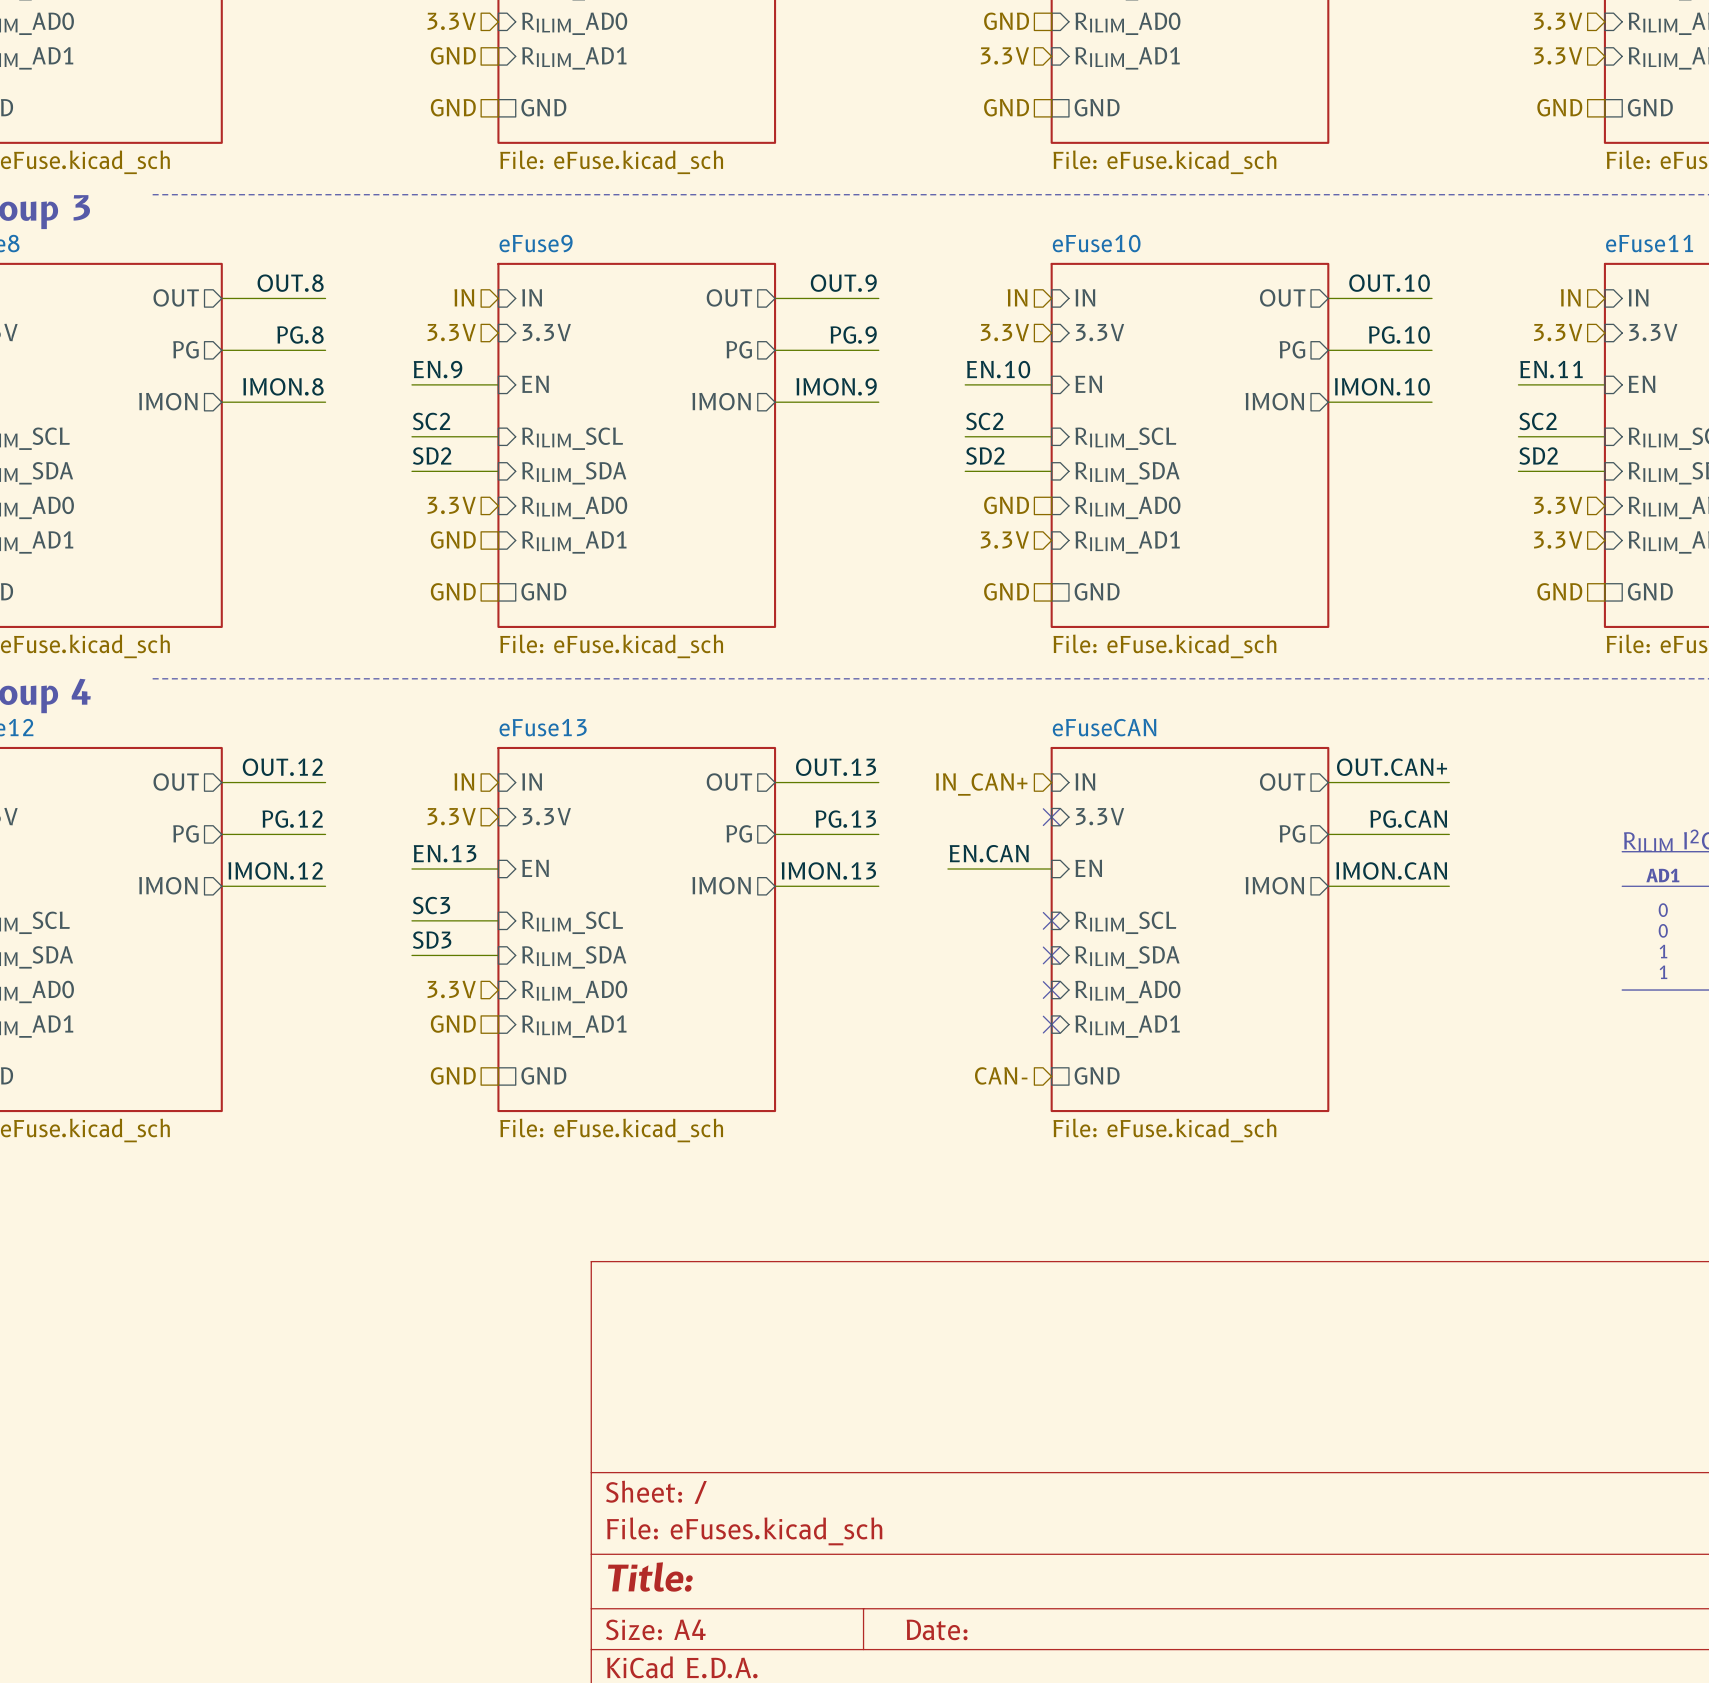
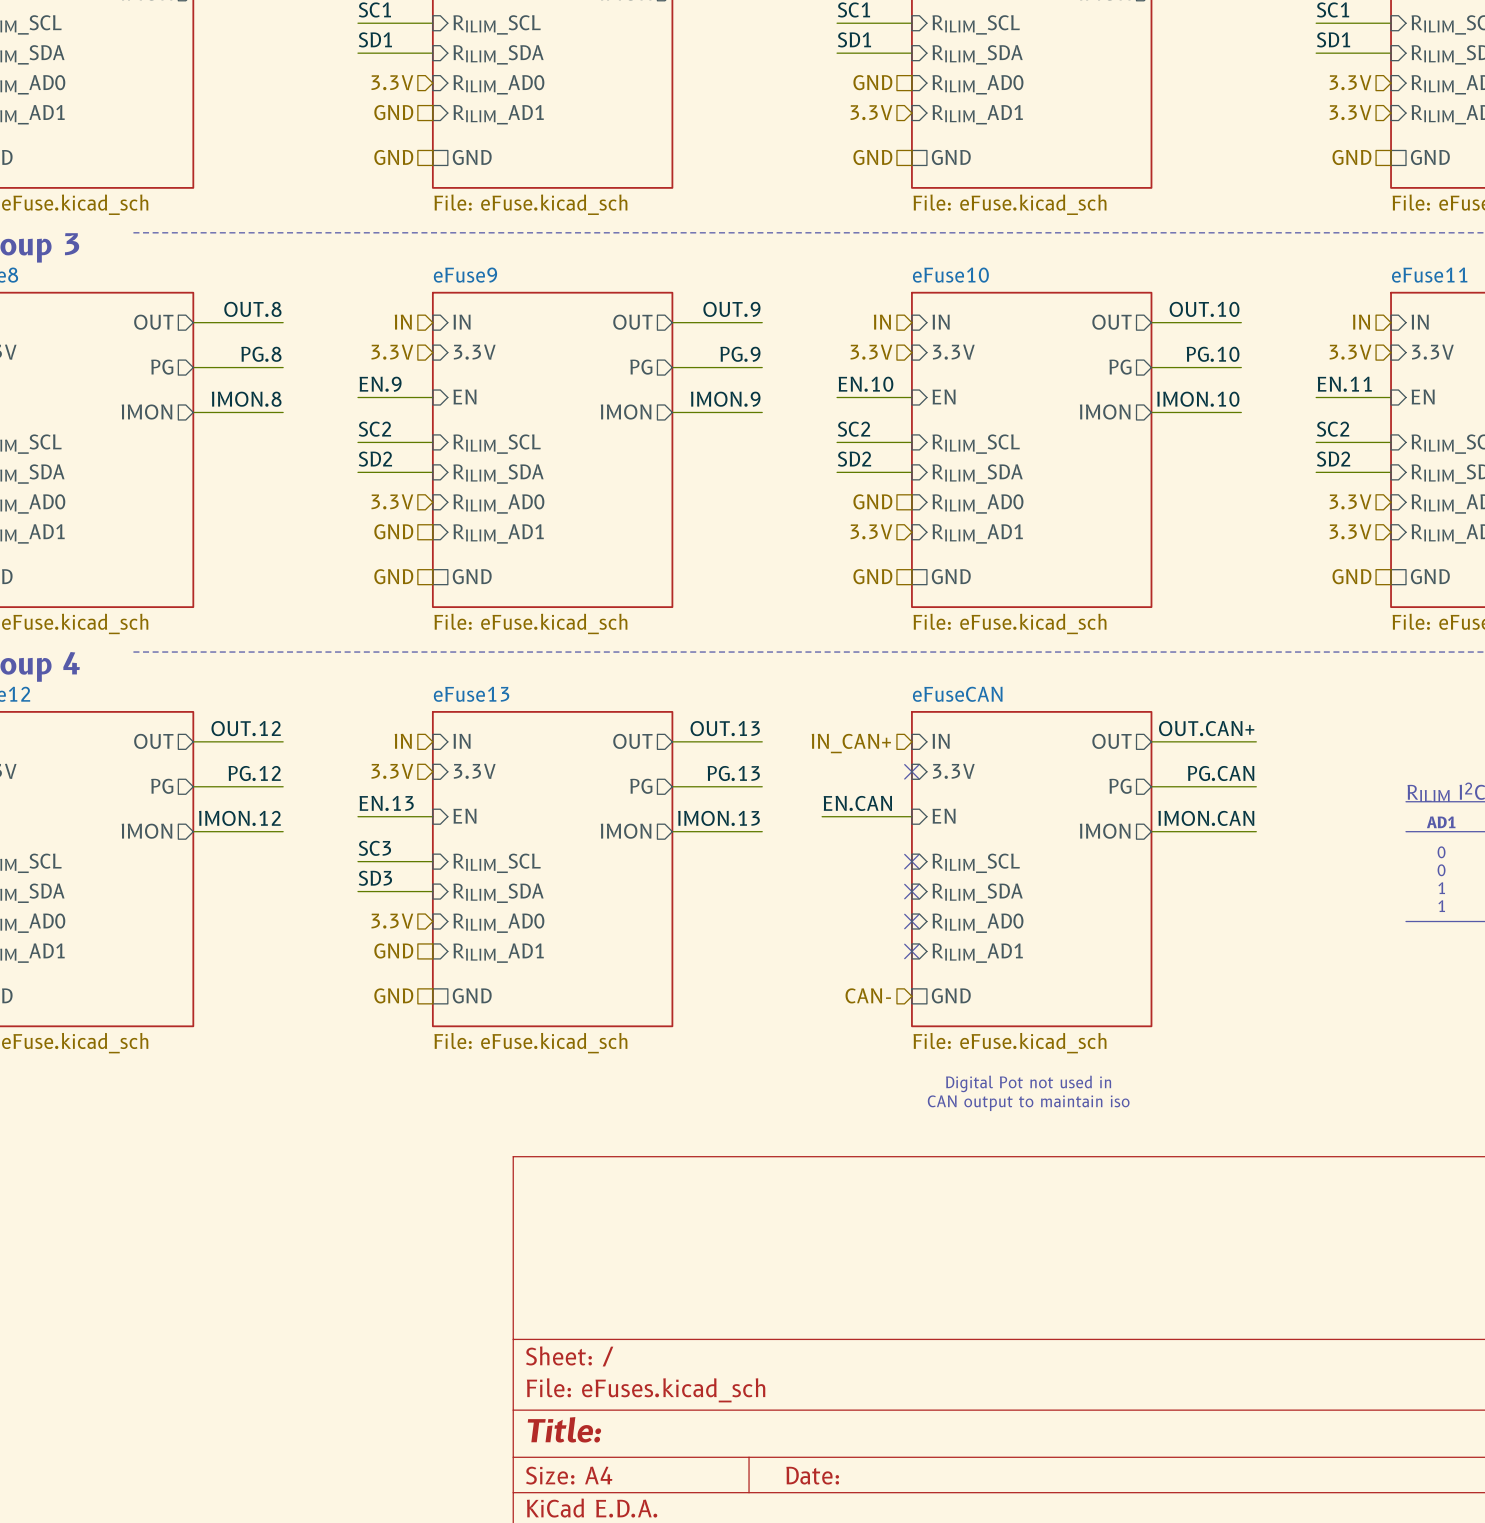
text: none -> Digital Pot not used in (1028, 1083)
text: none -> CAN output to maintain iso (1028, 1103)

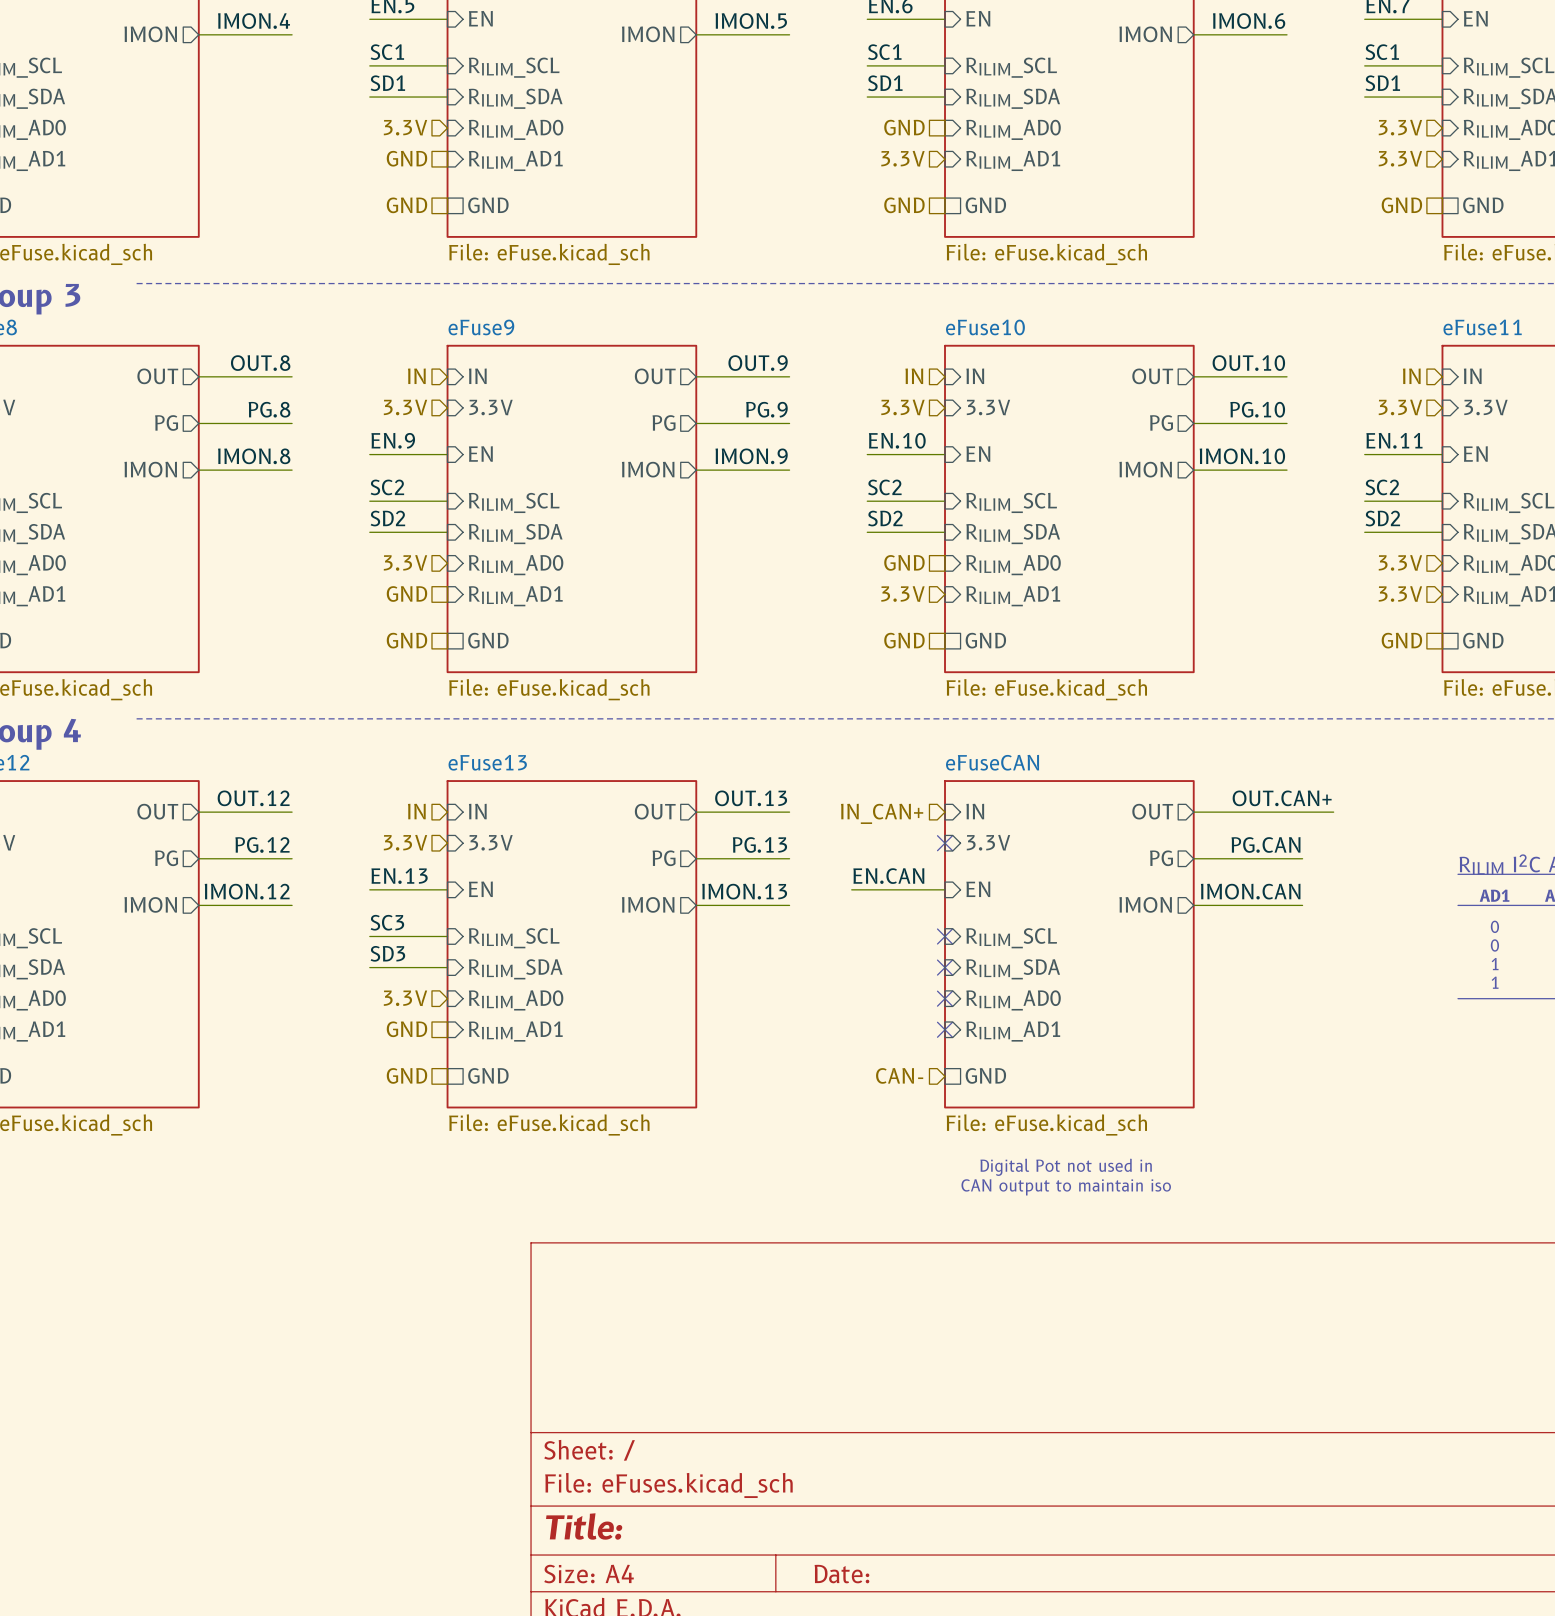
label position: OUT.CAN+ (1206, 728) -> OUT.CAN+ (1282, 798)
wire: none -> (1302, 812) (1333, 812)

